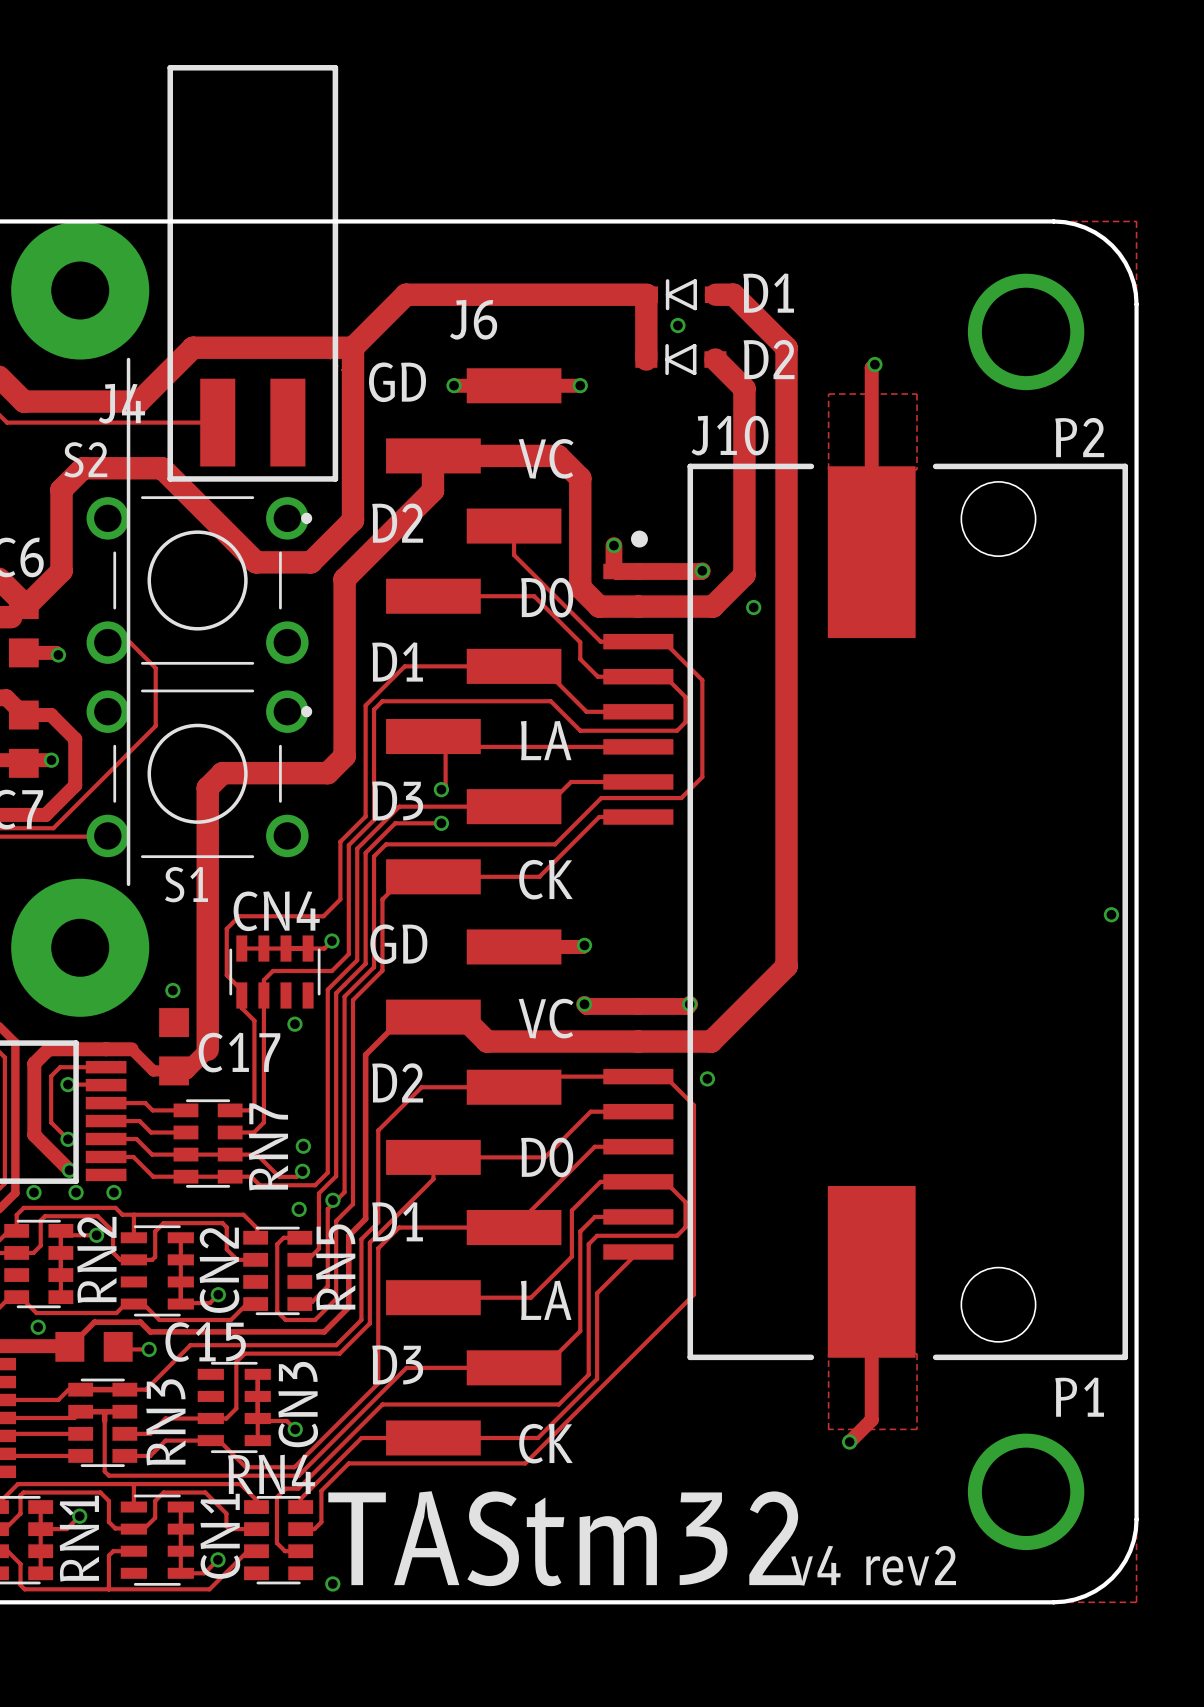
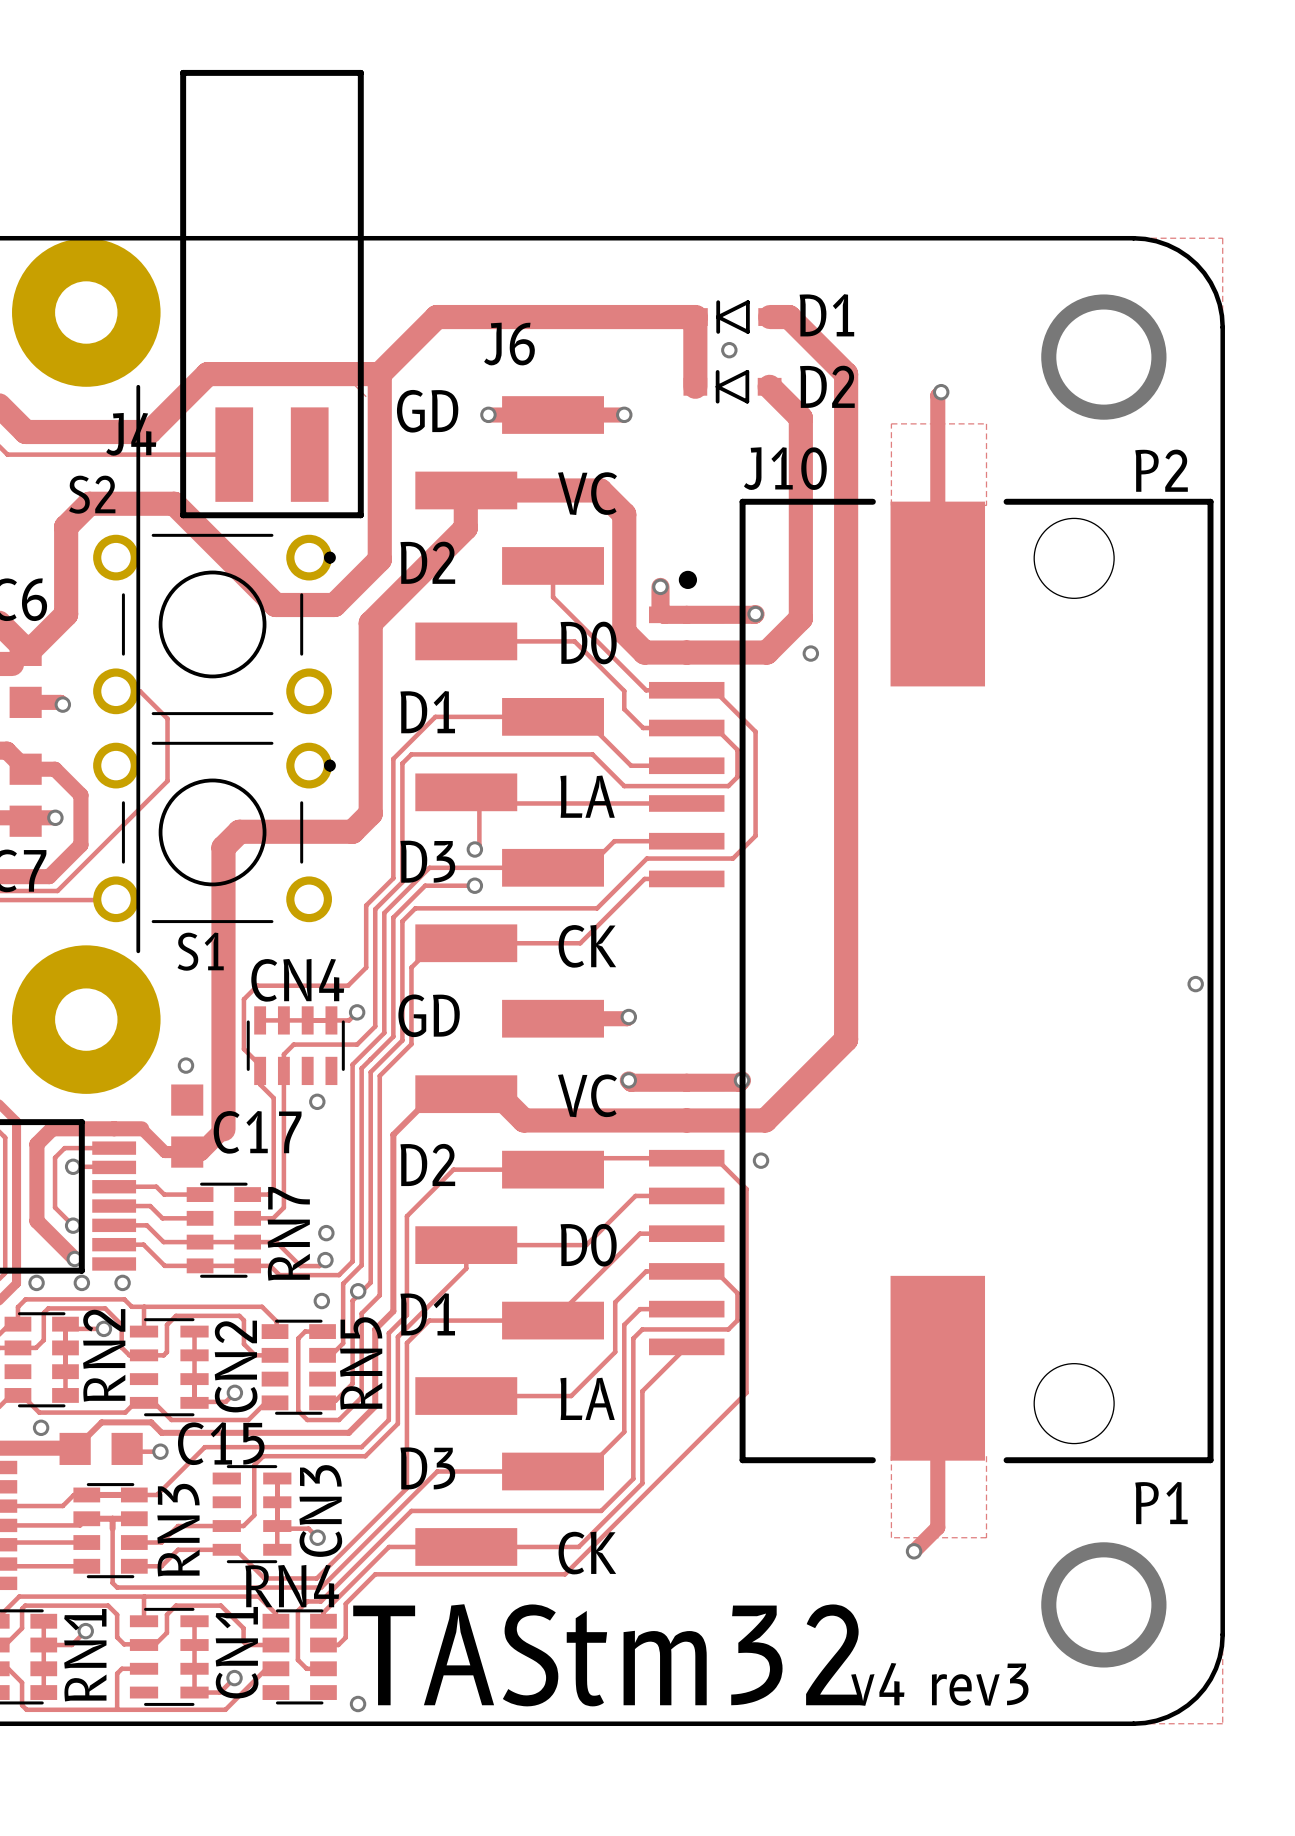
text: v4 rev2 (873, 1565) -> v4 rev3 (939, 1684)

